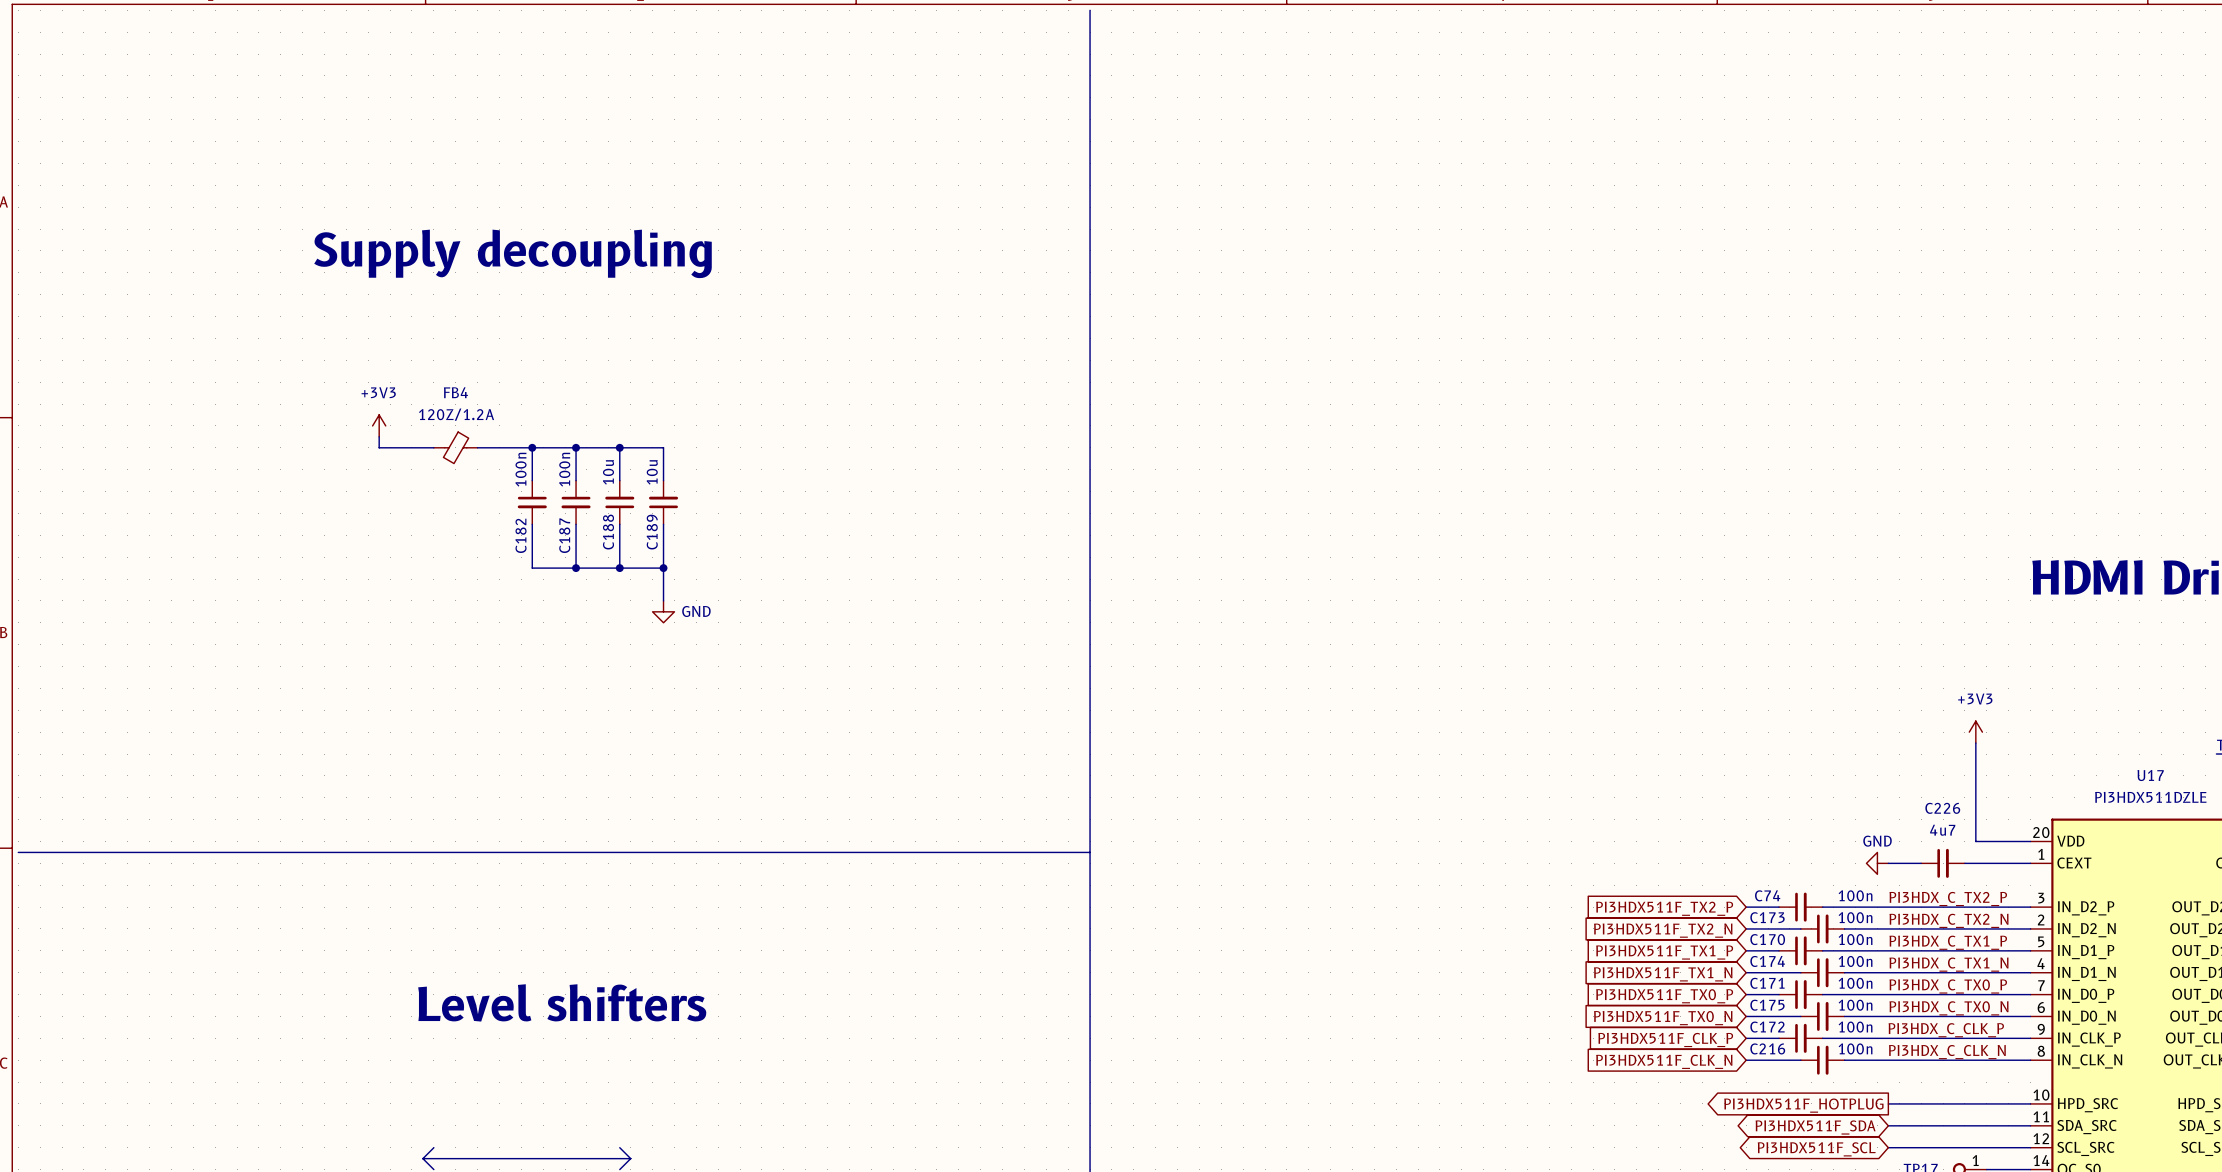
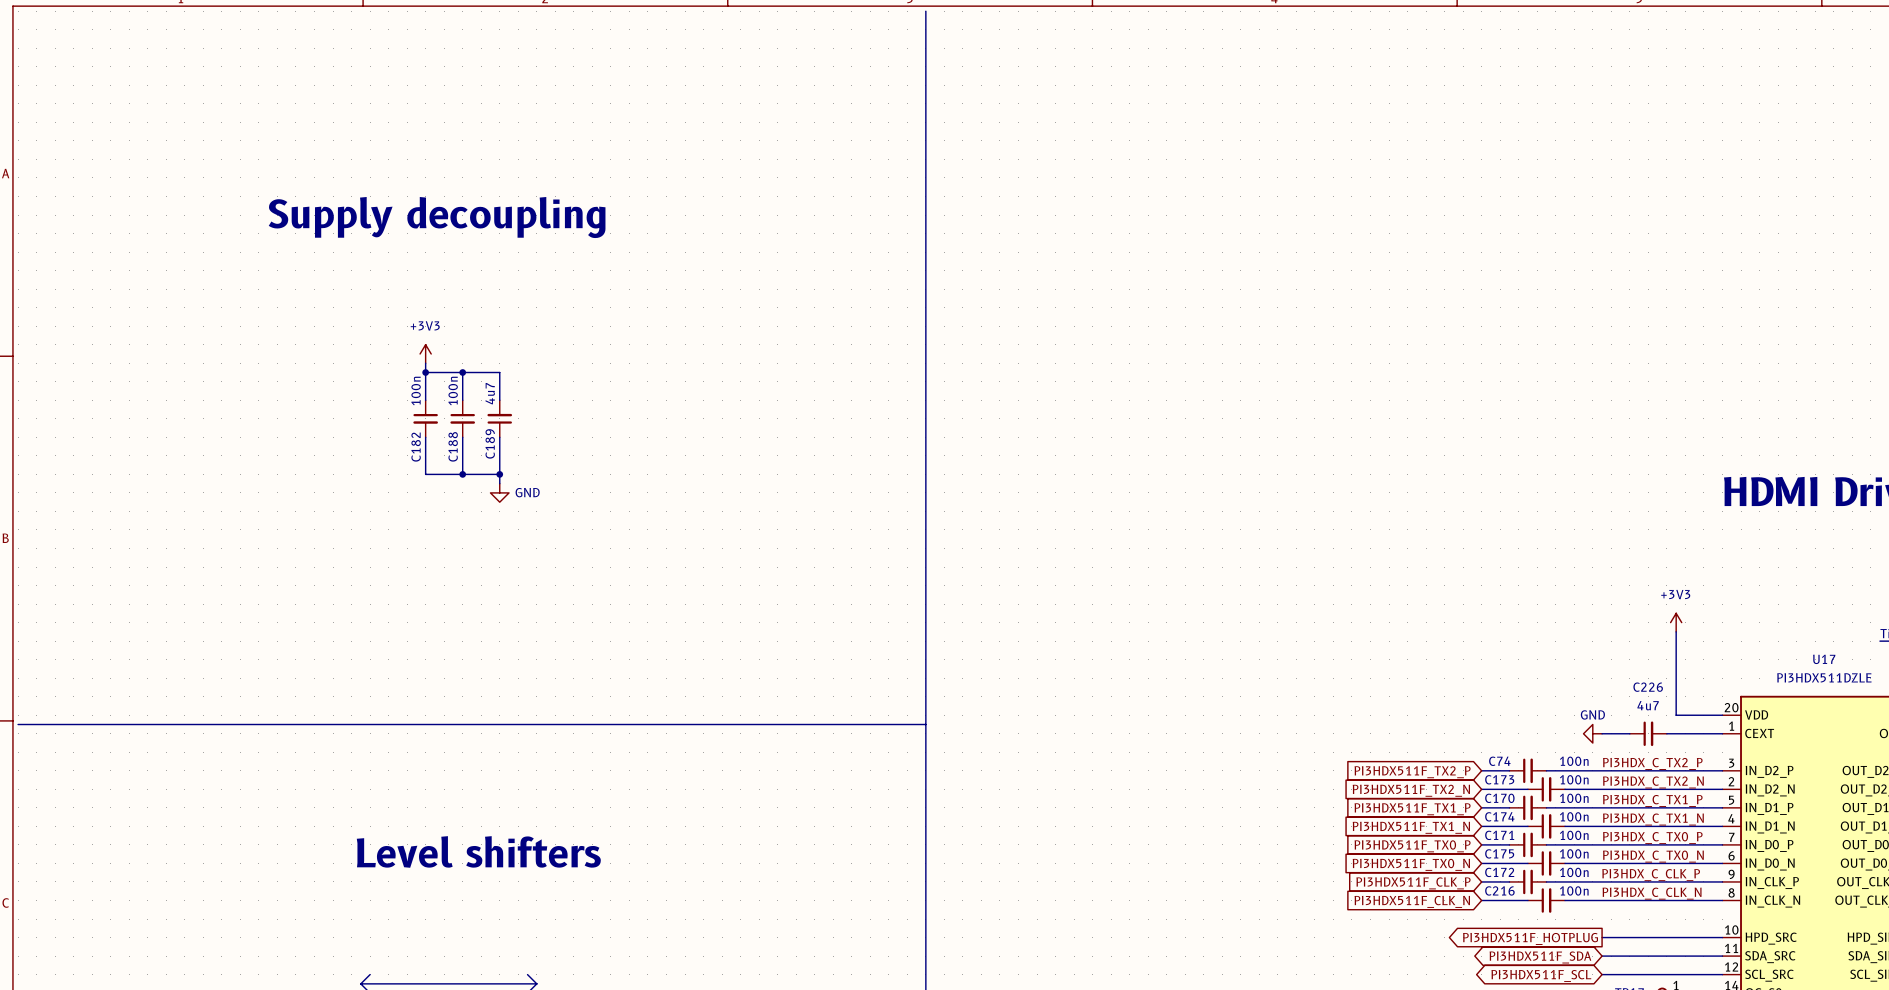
power symbol position: +3V3 (379, 425) -> +3V3 (425, 353)
wire: (379, 436) (379, 447) (433, 447) -> none
wire: none -> (425, 372) (499, 372) (499, 400)
junction: none -> (425, 372)
FB4: (455, 447) -> none
wire: (477, 447) (663, 447) (663, 480) -> none
wire: (532, 447) (532, 480) -> none
junction position: (532, 447) -> (462, 372)
wire: (576, 447) (576, 480) -> (462, 372) (462, 400)
junction: (576, 447) -> none
wire: (619, 447) (619, 480) -> none
junction: (619, 447) -> none
C188 text: 10u (608, 472) -> 100n (453, 391)
C189 text: 10u (652, 472) -> 4u7 (490, 393)
C182 position: (532, 502) -> (425, 418)
C187: (576, 502) -> none
C188 rotation: 0° (619, 502) -> 180° (462, 418)
C188 position: (619, 502) -> (462, 418)
C189 position: (663, 502) -> (499, 418)
wire: none -> (425, 437) (425, 474) (499, 474)
wire: none -> (499, 437) (499, 483)
wire: (532, 524) (532, 568) (663, 568) -> none
wire: (576, 524) (576, 568) -> (462, 437) (462, 474)
wire: (619, 524) (619, 568) -> (425, 363) (425, 400)
wire: (663, 524) (663, 600) -> none
junction: none -> (462, 474)
junction position: (576, 568) -> (499, 474)
junction: (619, 568) -> none
junction: (663, 568) -> none
power symbol position: GND (663, 611) -> GND (499, 492)

